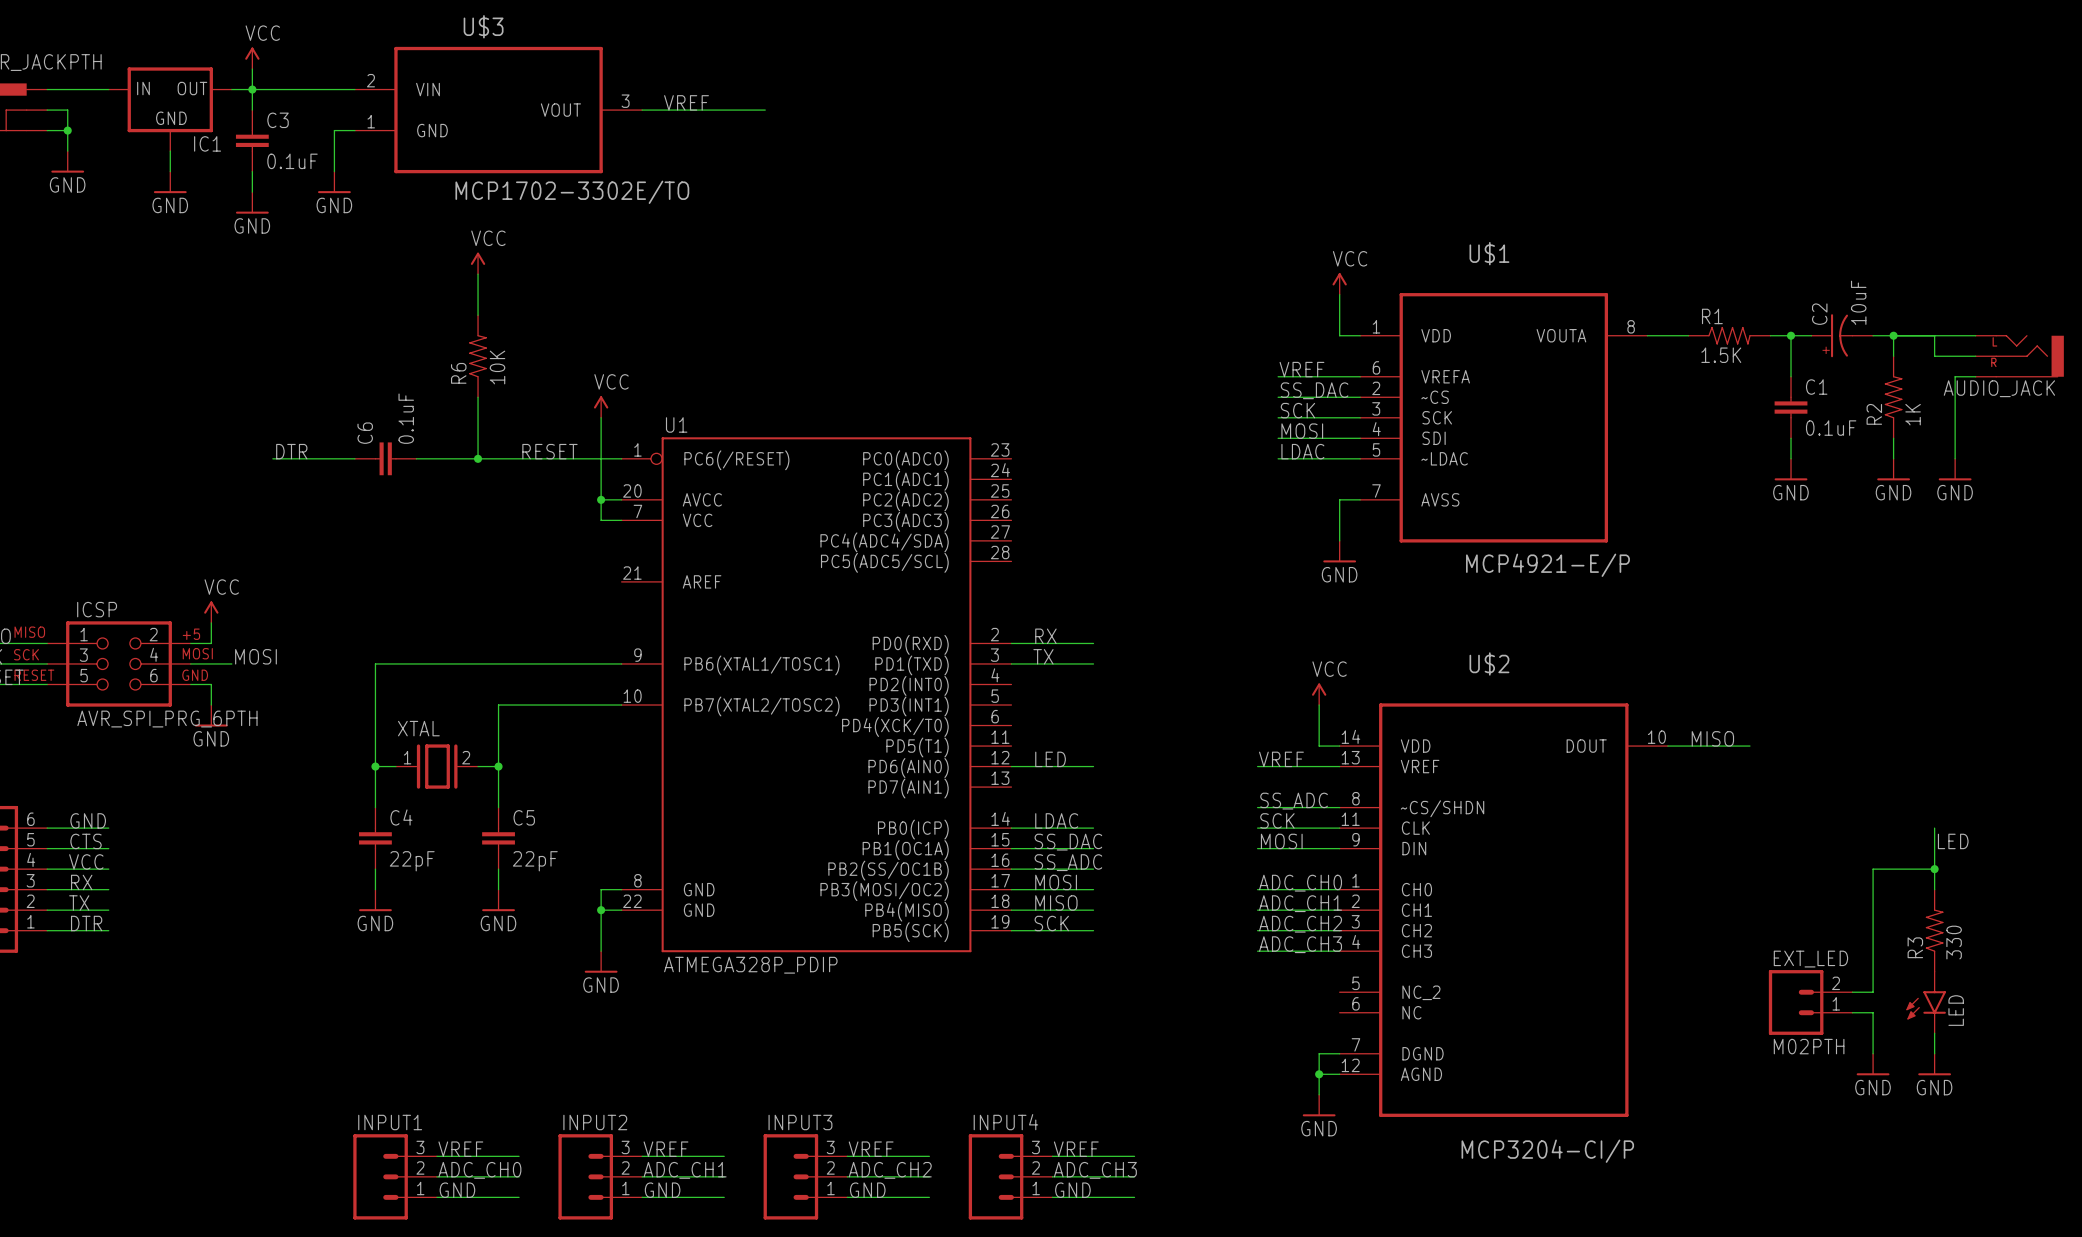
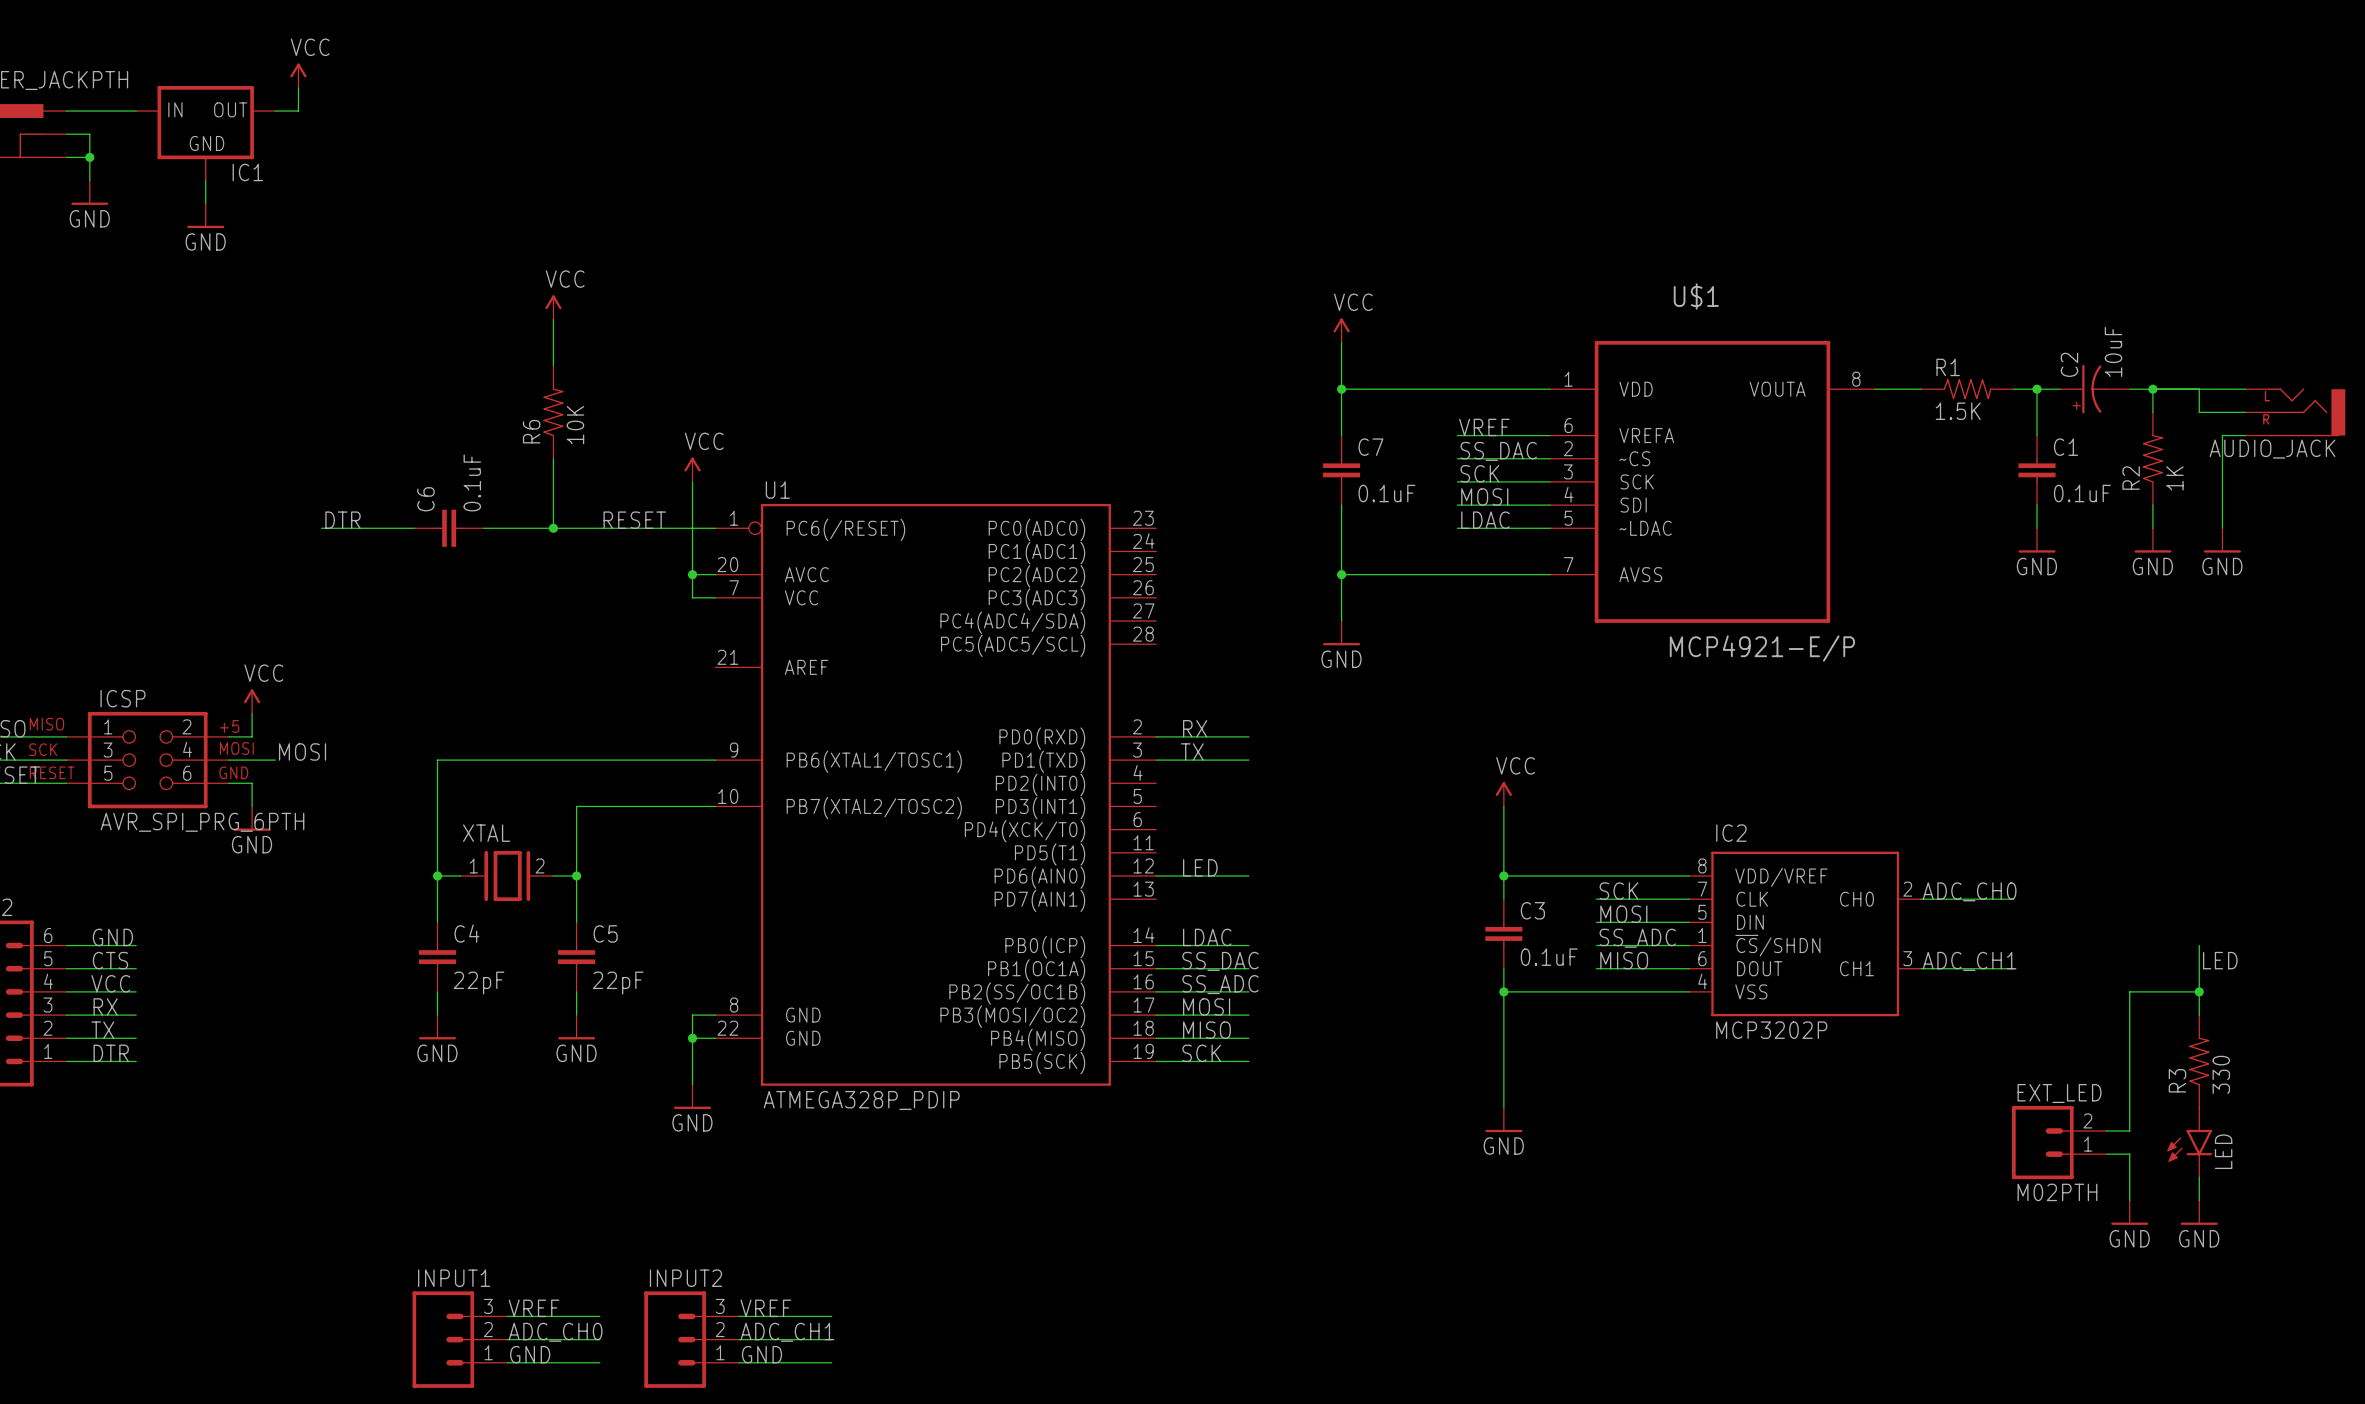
junction: (252, 89) -> none
wire: (354, 89) (252, 89) (252, 110) -> none
label: VREF (686, 102) -> none
U$3: MCP1702-3302E/TO (498, 110) -> none
wire: (642, 110) (765, 110) -> none
wire: (354, 130) (334, 130) (334, 171) -> none
C3 position: (252, 140) -> (1503, 933)
wire: (252, 171) (252, 192) -> none
power symbol: GND (334, 182) -> none
power symbol: GND (252, 202) -> none
power symbol position: VCC (1339, 283) -> VCC (1341, 330)
wire: none -> (1341, 342) (1341, 435)
wire: (1339, 294) (1339, 335) -> (1341, 389) (1527, 389)
junction: none -> (1341, 389)
C7: none -> 0.1uF (1341, 470)
wire: none -> (1341, 505) (1341, 621)
junction: none -> (1341, 574)
wire: (1339, 499) (1339, 540) -> (1527, 574) (1341, 574)
power symbol position: GND (1339, 551) -> GND (1341, 633)
label: MISO (1712, 738) -> none
wire: (1319, 746) (1339, 746) -> (1503, 852) (1503, 899)
wire: (1667, 746) (1749, 746) -> (1921, 899) (2013, 899)
label: VREF (1281, 759) -> none
wire: (1257, 766) (1319, 766) -> none
junction: none -> (1503, 876)
wire: none -> (1527, 876) (1689, 876)
label: none -> ADC_CH0 (1969, 891)
label position: SS_ADC (1294, 801) -> SS_ADC (1637, 938)
wire: (1257, 807) (1339, 807) -> none
IC2: none -> MCP3202P (1805, 933)
label position: SCK (1277, 820) -> SCK (1618, 891)
wire: (1257, 828) (1339, 828) -> none
label position: MOSI (1281, 841) -> MOSI (1623, 914)
label: none -> MISO (1624, 960)
label: none -> ADC_CH1 (1969, 961)
wire: (1257, 848) (1339, 848) -> none
wire: none -> (1503, 968) (1503, 1107)
wire: none -> (1921, 968) (2013, 968)
wire: none -> (1503, 991) (1689, 991)
junction: none -> (1503, 991)
label: ADC_CH0 (1300, 883) -> none
wire: (1257, 889) (1339, 889) -> (1596, 899) (1689, 899)
label: ADC_CH1 (1300, 903) -> none
wire: (1257, 910) (1339, 910) -> (1596, 922) (1689, 922)
U$2: MCP3204-CI/P (1503, 910) -> none
label: ADC_CH2 (1300, 924) -> none
wire: (1257, 930) (1339, 930) -> (1596, 945) (1689, 945)
label: ADC_CH3 (1300, 944) -> none
wire: (1257, 951) (1339, 951) -> (1596, 968) (1689, 968)
wire: (1339, 1053) (1319, 1053) (1319, 1094) -> none
wire: (1319, 1074) (1339, 1074) -> none
junction: (1319, 1074) -> none
power symbol position: GND (1319, 1105) -> GND (1503, 1119)
label: VREF (871, 1149) -> none
label: VREF (1076, 1149) -> none
wire: (847, 1156) (929, 1156) -> none
wire: (1052, 1156) (1134, 1156) -> none
label: ADC_CH2 (890, 1170) -> none
label: ADC_CH3 (1095, 1170) -> none
INPUT3: (805, 1176) -> none
wire: (847, 1176) (929, 1176) -> none
INPUT4: (1010, 1176) -> none
wire: (1052, 1176) (1134, 1176) -> none
label: GND (867, 1190) -> none
label: GND (1072, 1190) -> none
wire: (847, 1197) (929, 1197) -> none
wire: (1052, 1197) (1134, 1197) -> none

